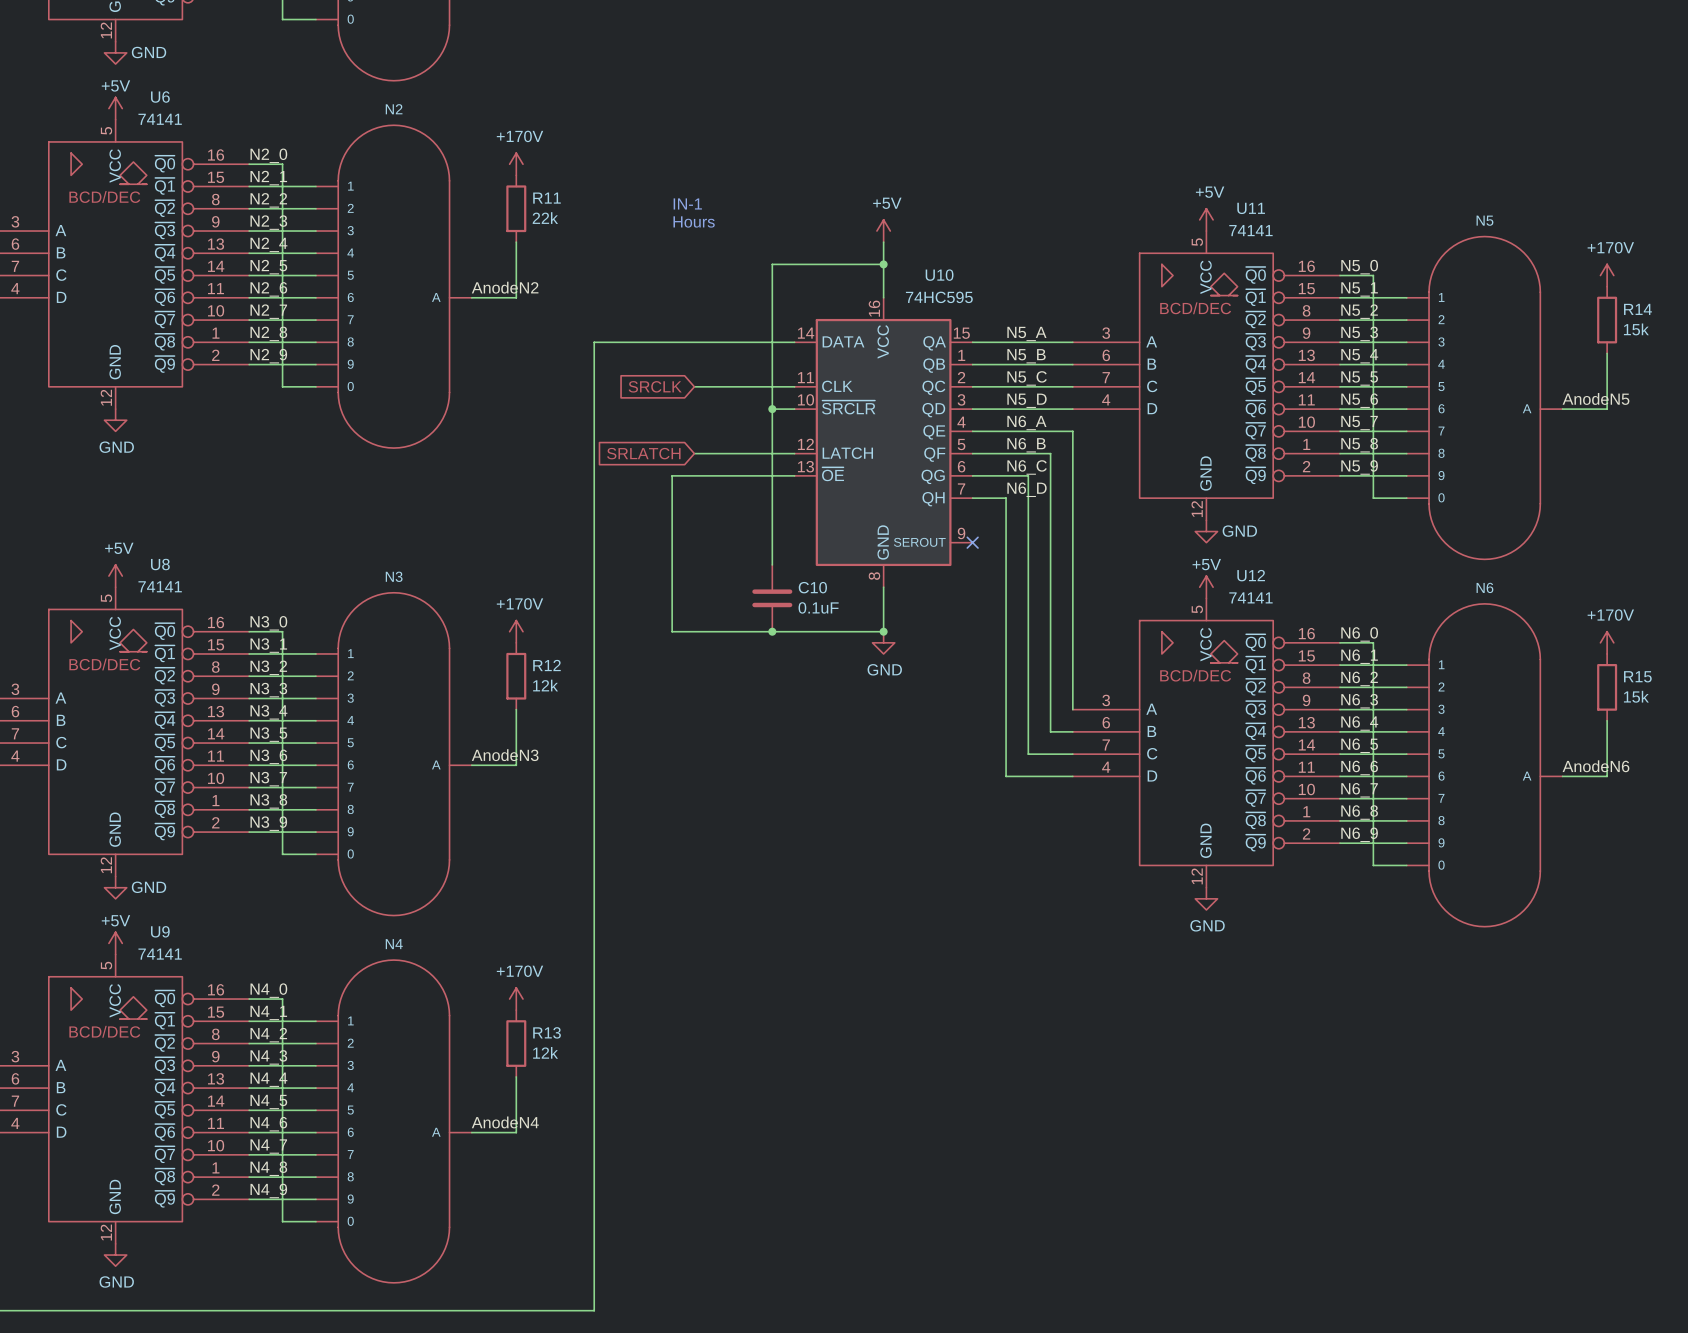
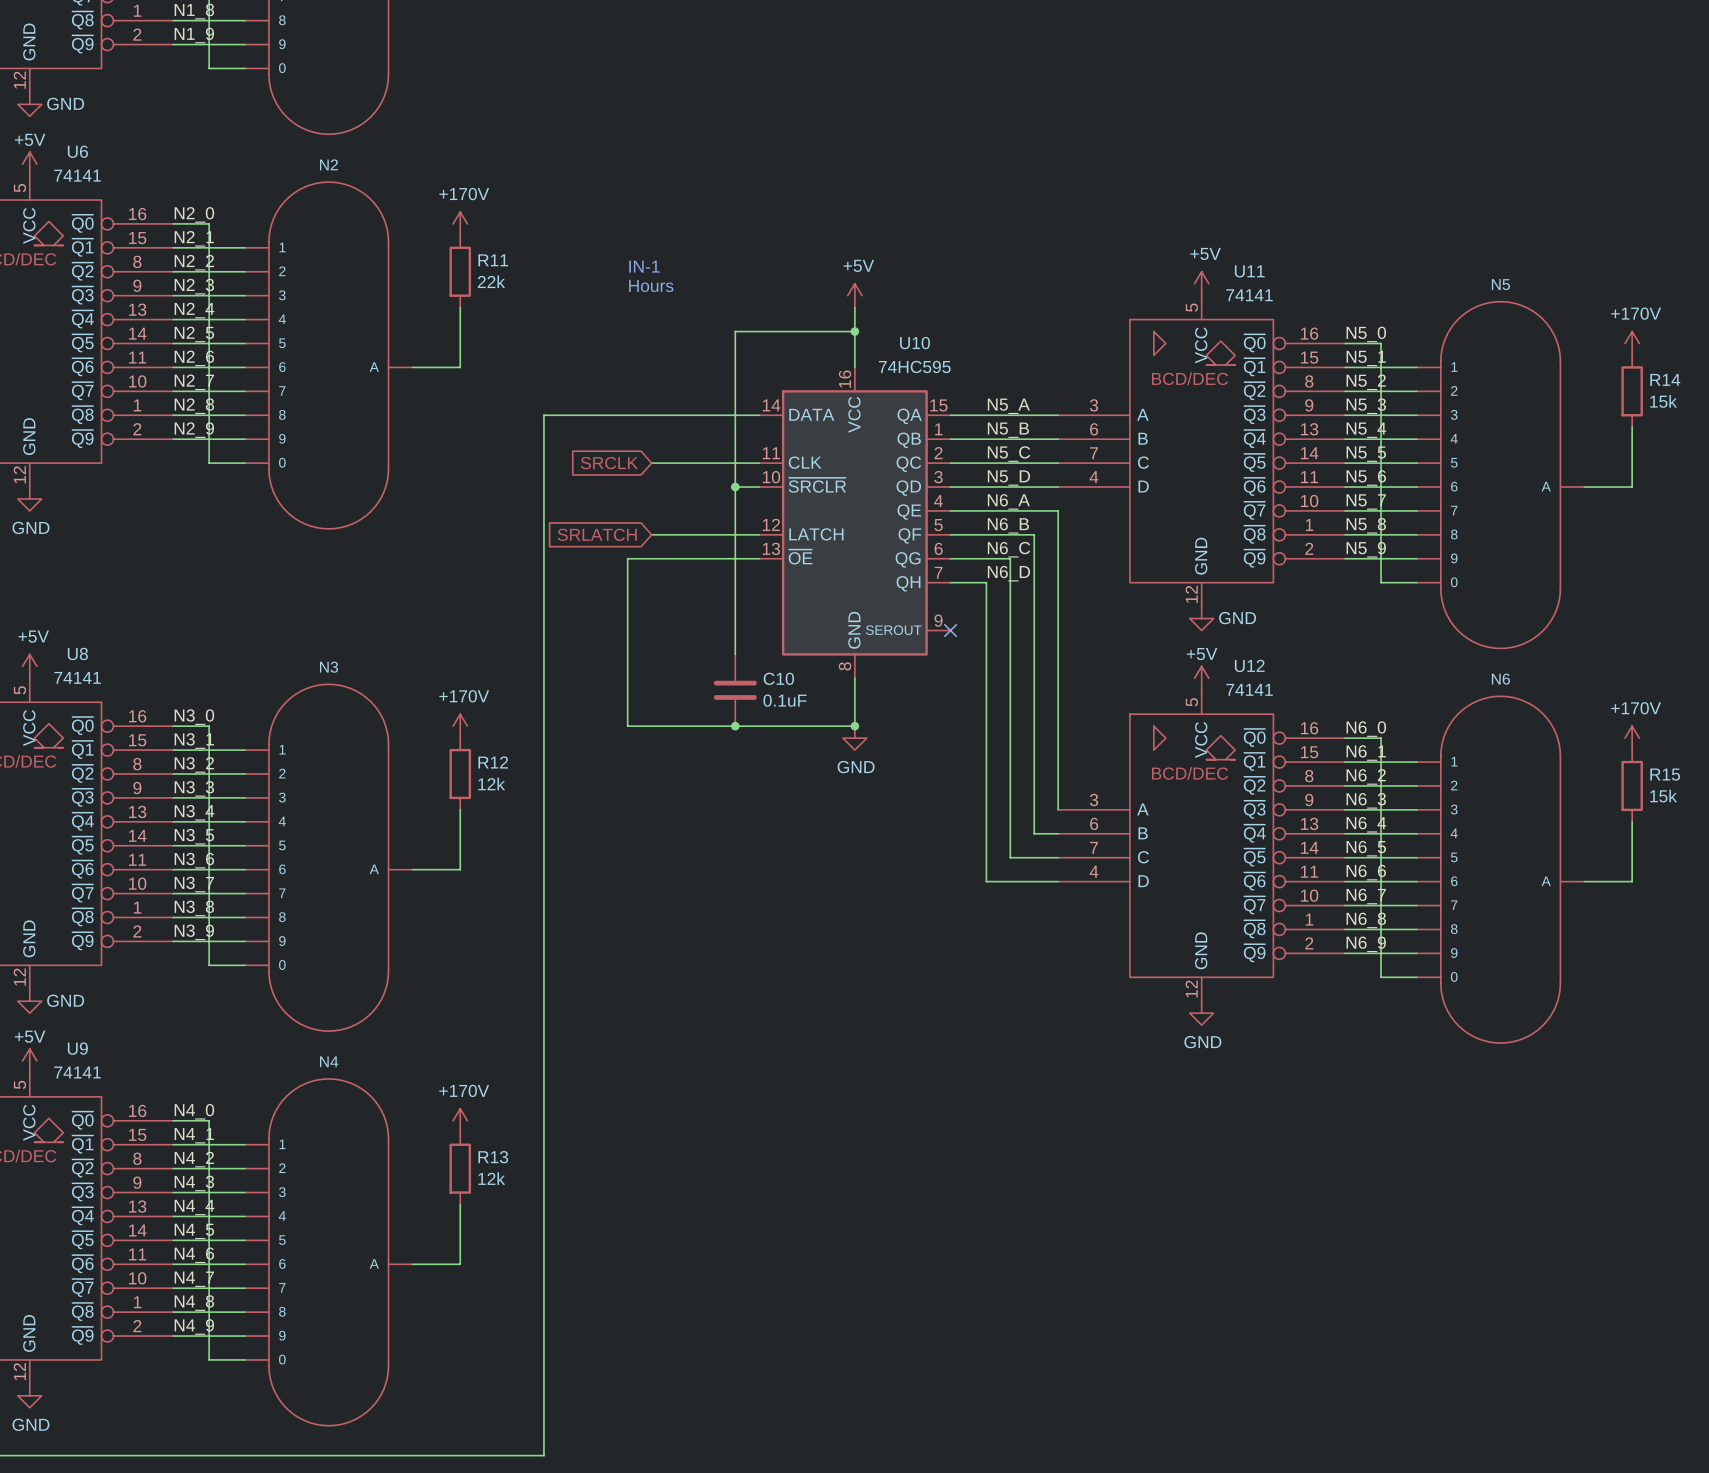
label: AnodeN2 (505, 287) -> none
label: AnodeN5 (1596, 398) -> none
label: AnodeN3 (505, 755) -> none
label: AnodeN6 (1595, 766) -> none
label: AnodeN4 (505, 1122) -> none

